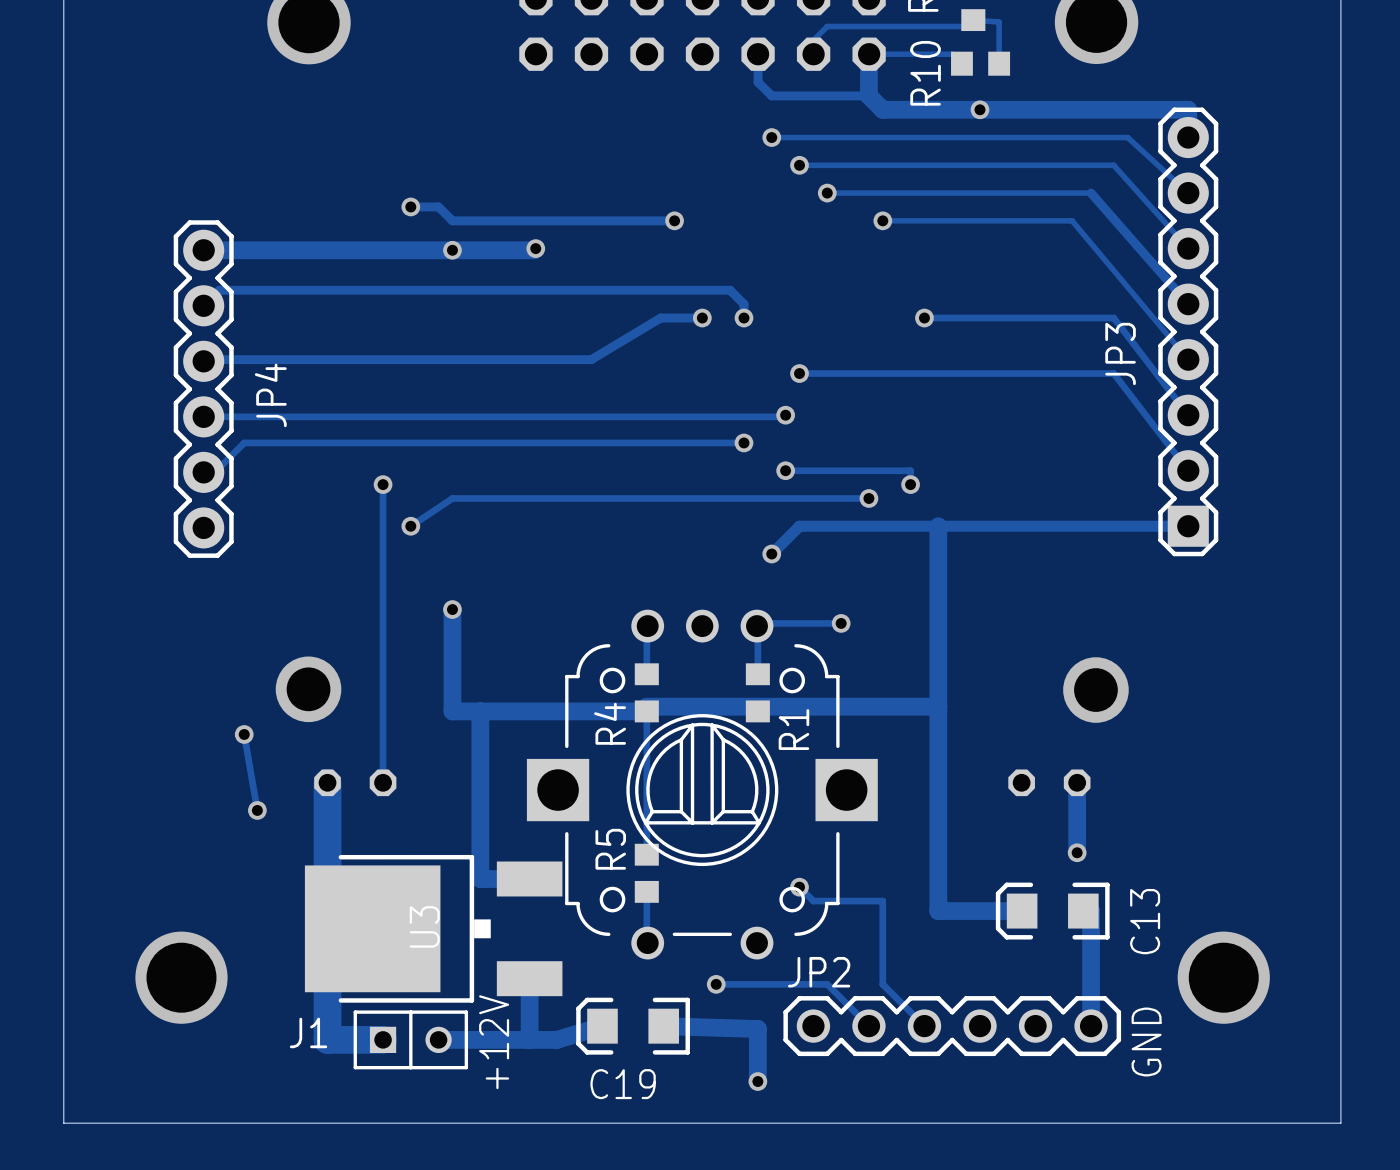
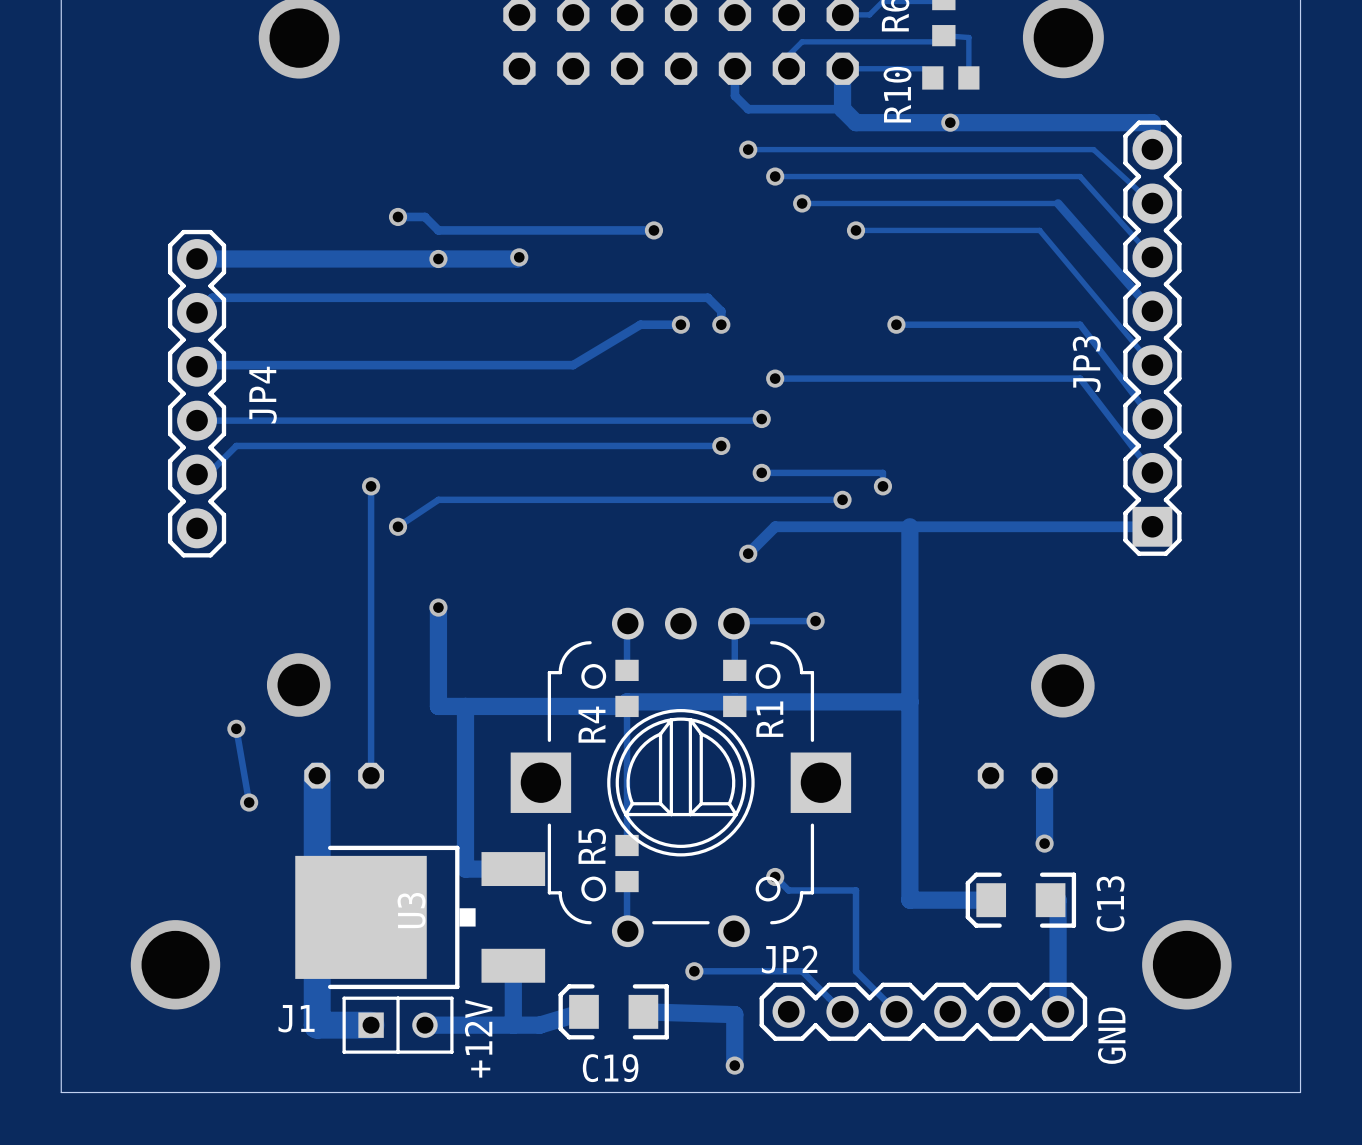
board edge: (63, 1109) (63, 1123) (1340, 1123) (1340, 1109) -> (61, 1092) (1300, 1092)

